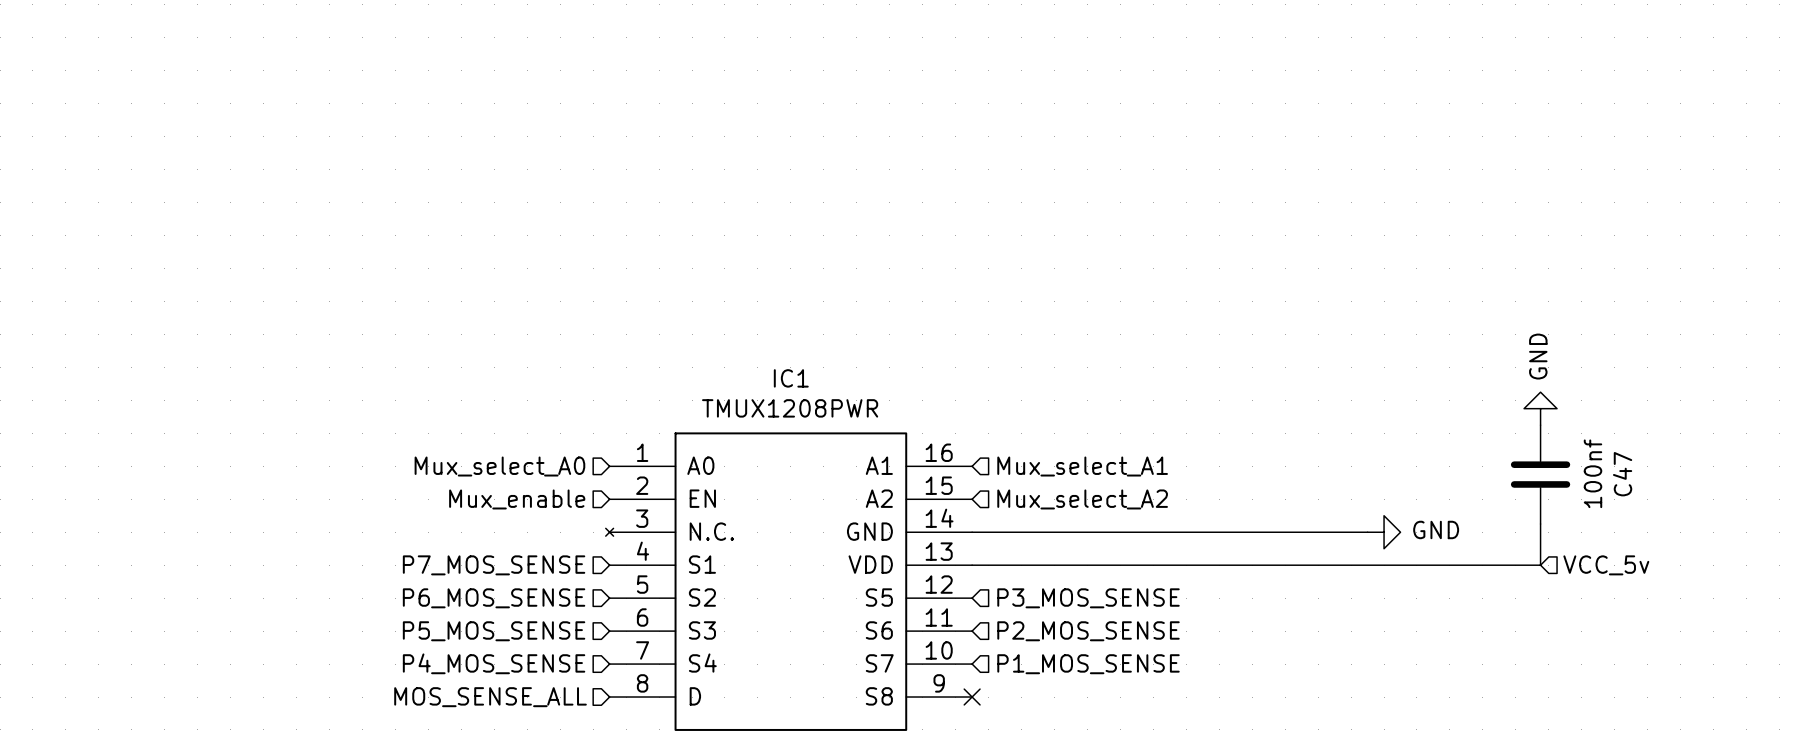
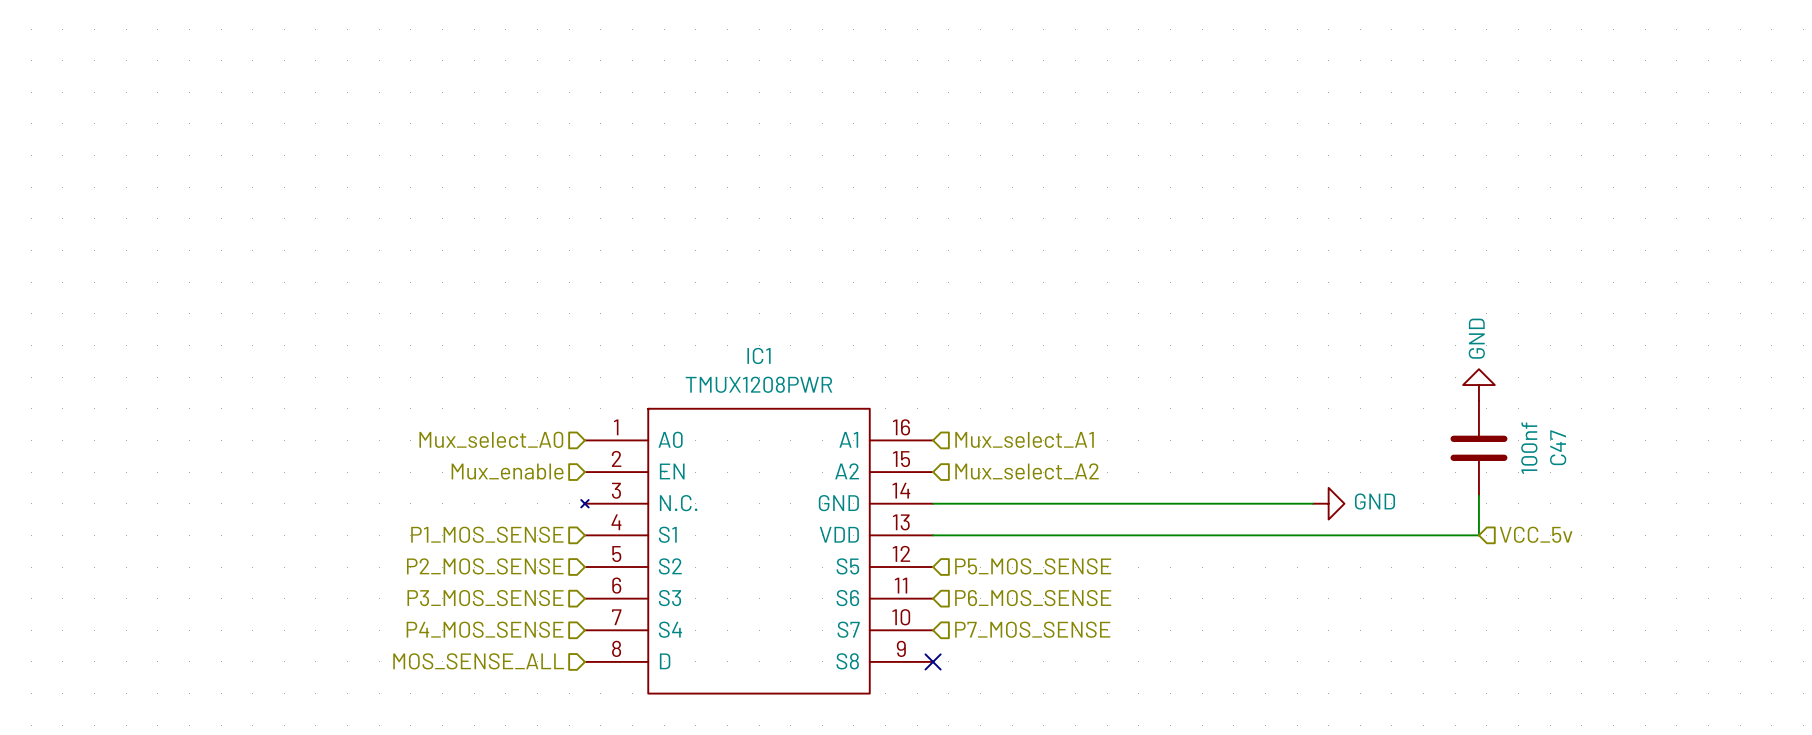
hierarchical label: P7_MOS_SENSE (494, 565) -> P1_MOS_SENSE (487, 534)
hierarchical label: P6_MOS_SENSE (494, 598) -> P2_MOS_SENSE (485, 566)
hierarchical label: P3_MOS_SENSE (1088, 598) -> P5_MOS_SENSE (1033, 566)
hierarchical label: P5_MOS_SENSE (494, 631) -> P3_MOS_SENSE (485, 598)
hierarchical label: P2_MOS_SENSE (1088, 631) -> P6_MOS_SENSE (1033, 598)
hierarchical label: P1_MOS_SENSE (1088, 664) -> P7_MOS_SENSE (1032, 629)

